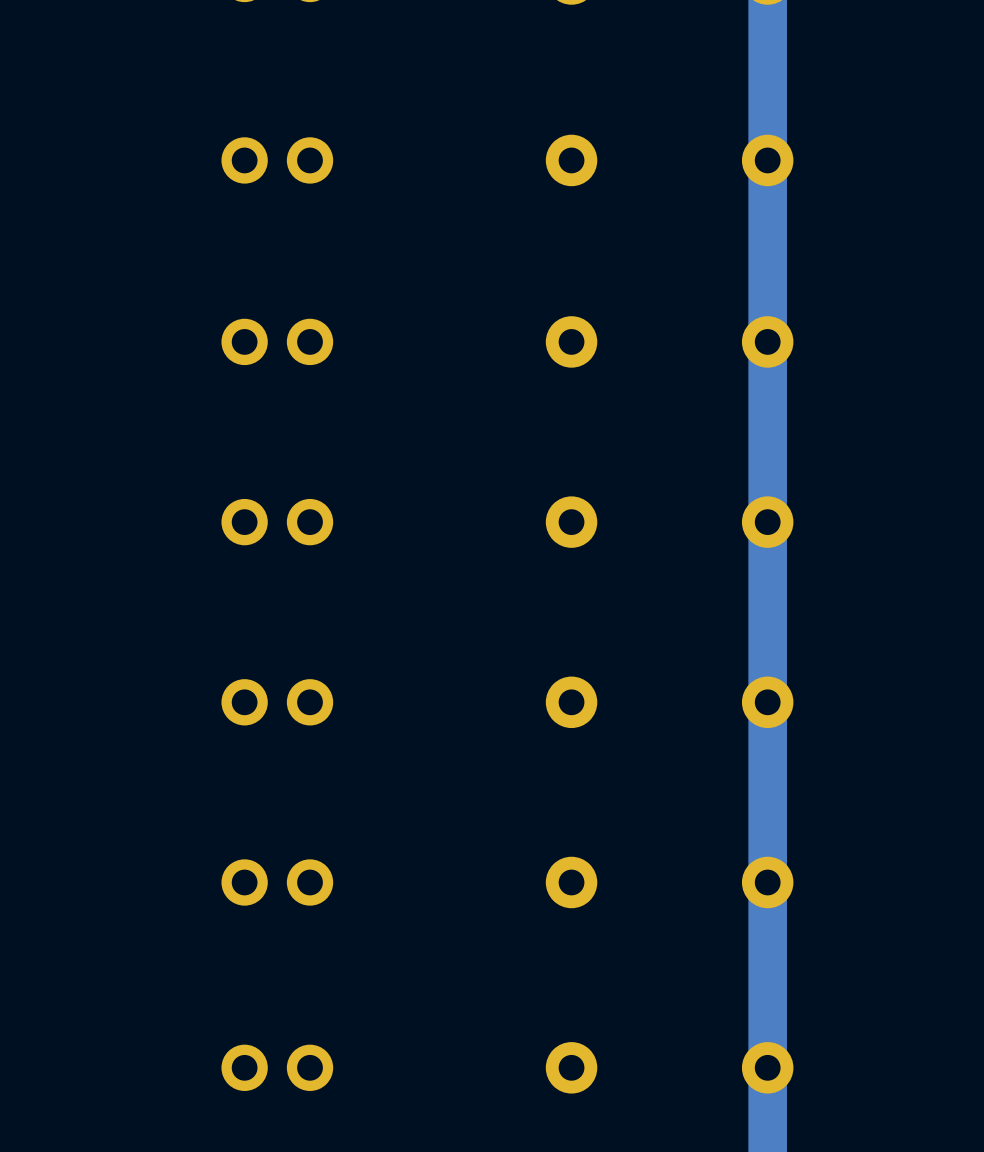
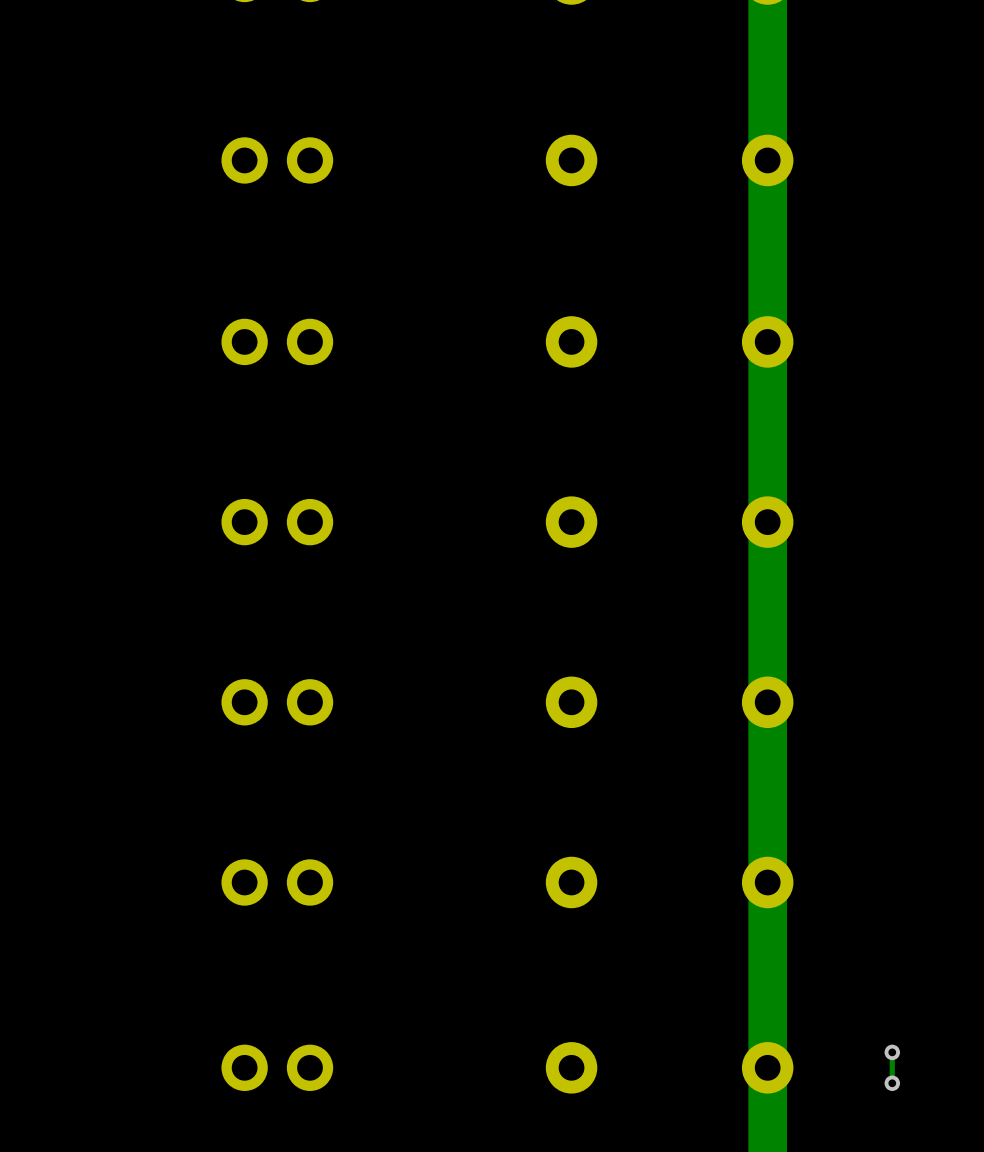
track: none -> (892, 1052) (892, 1083)
via: none -> (892, 1052)
via: none -> (892, 1083)

